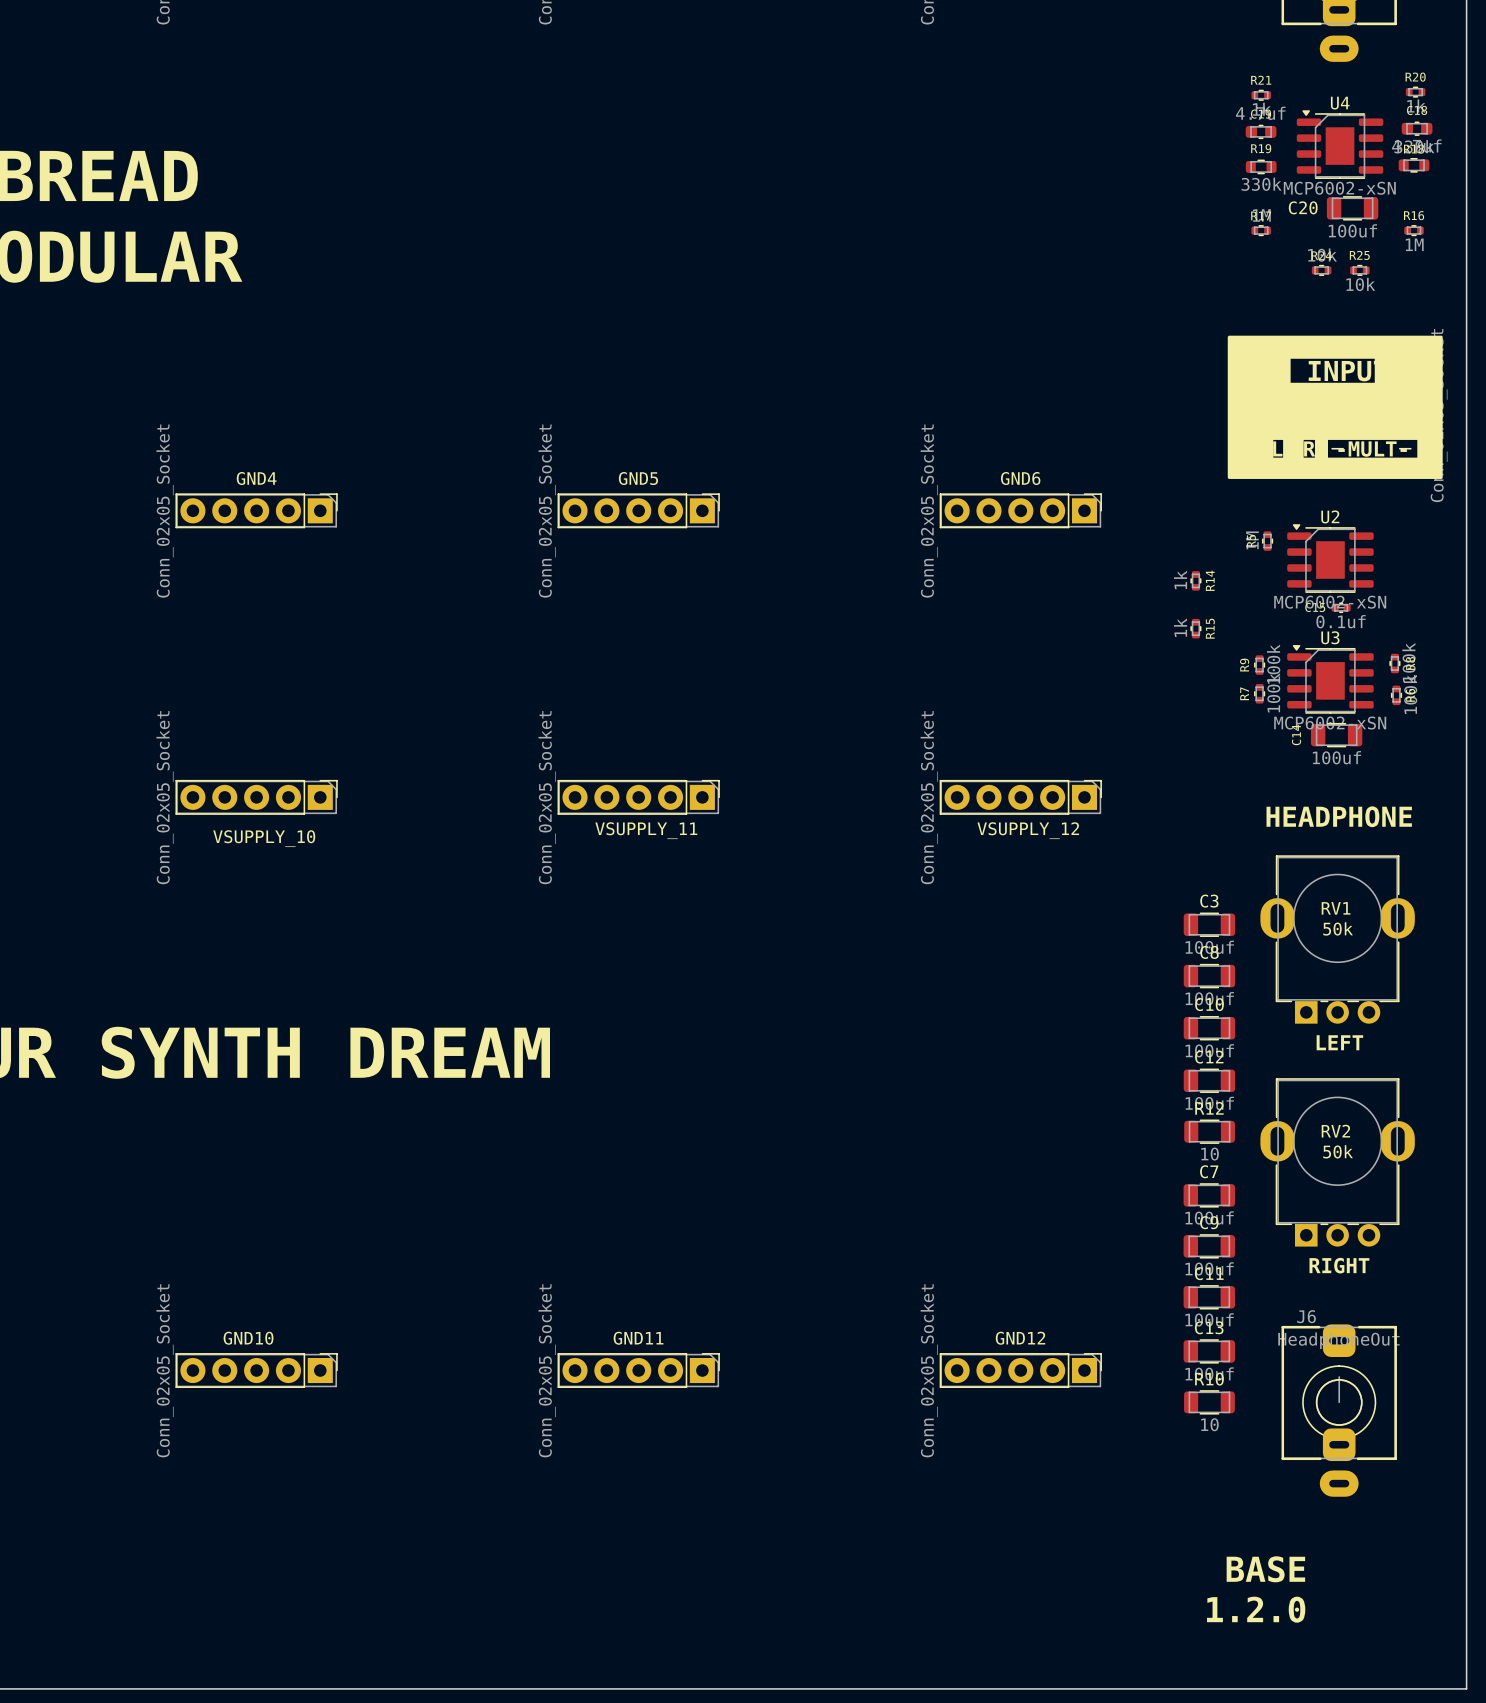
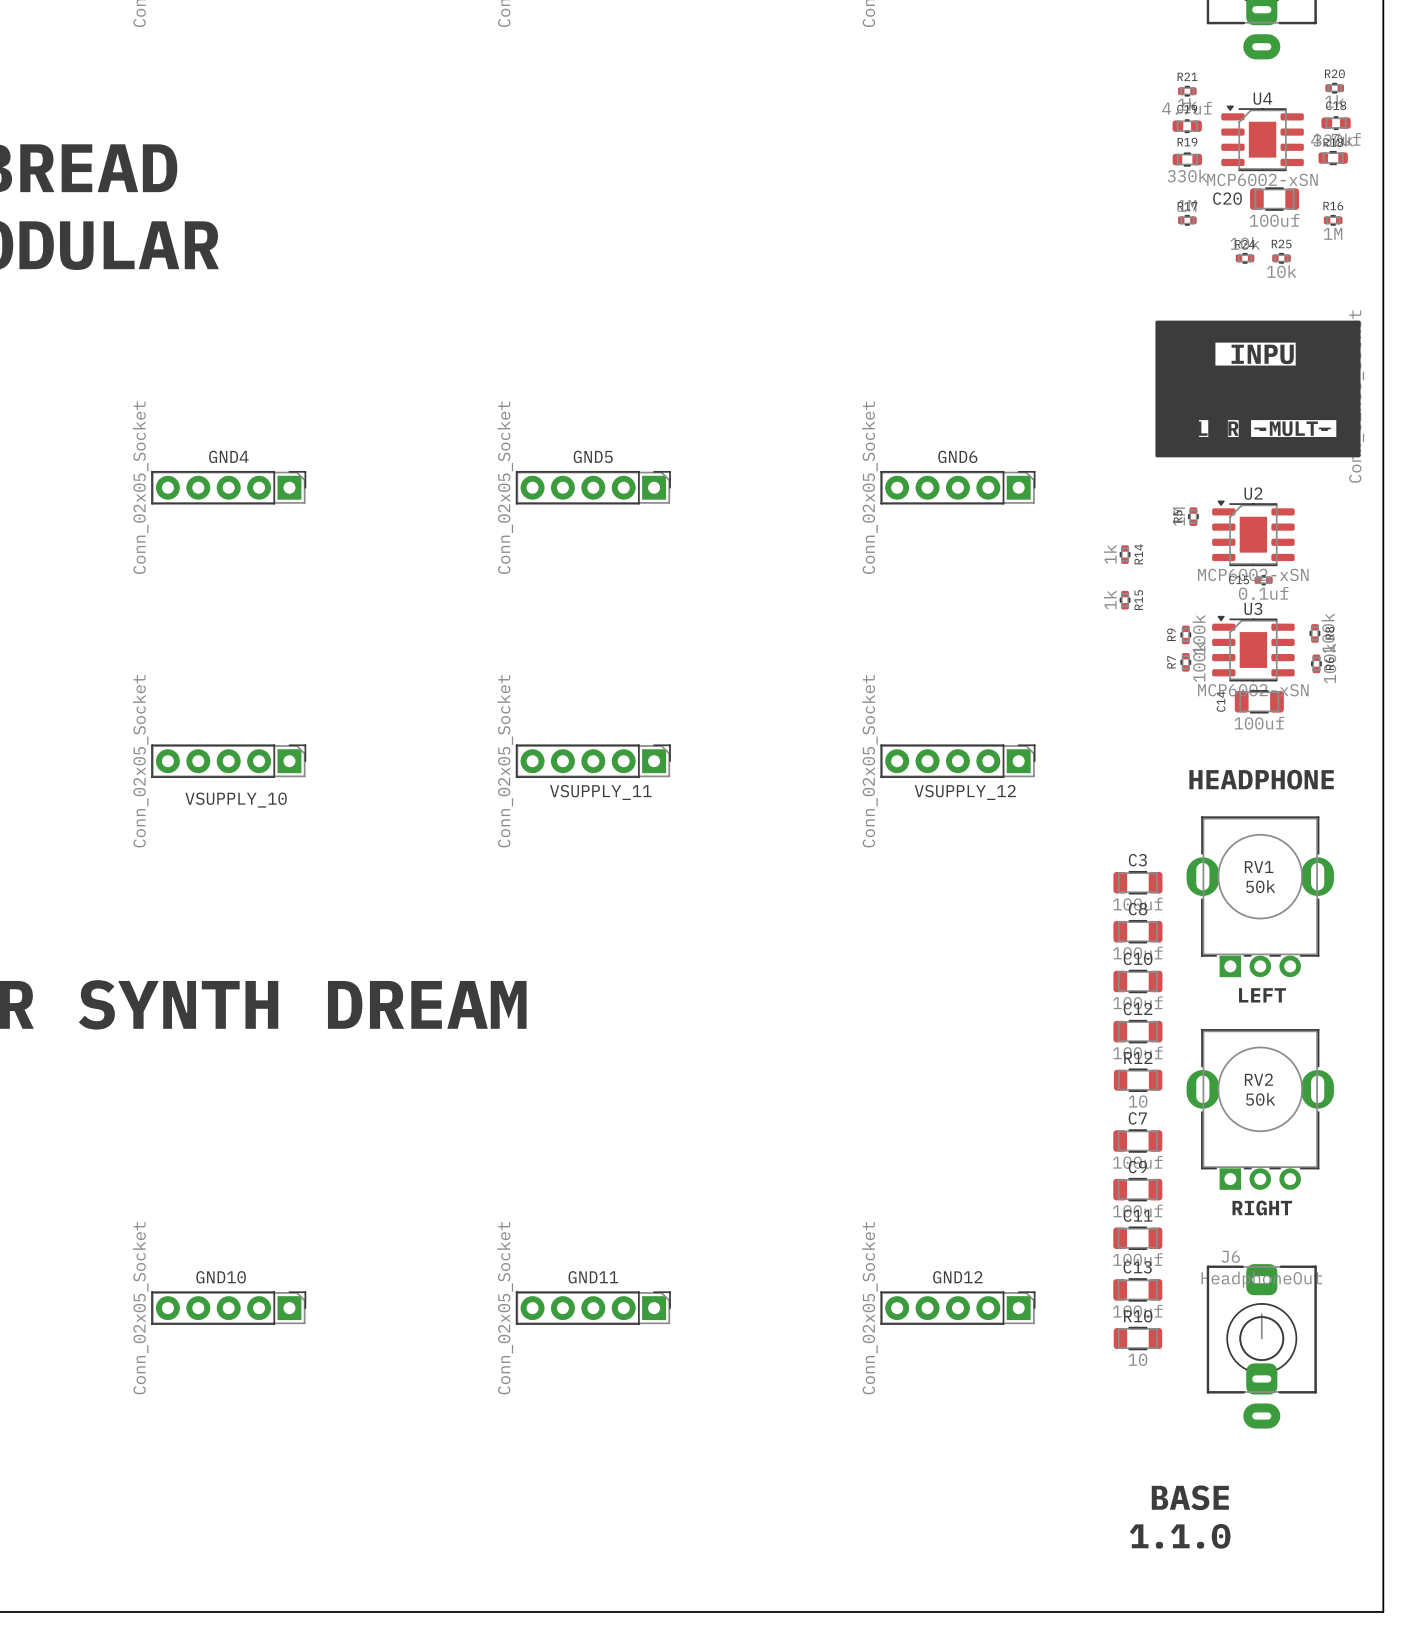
text: 1.2.0 (1256, 1609) -> 1.1.0 (1180, 1536)

